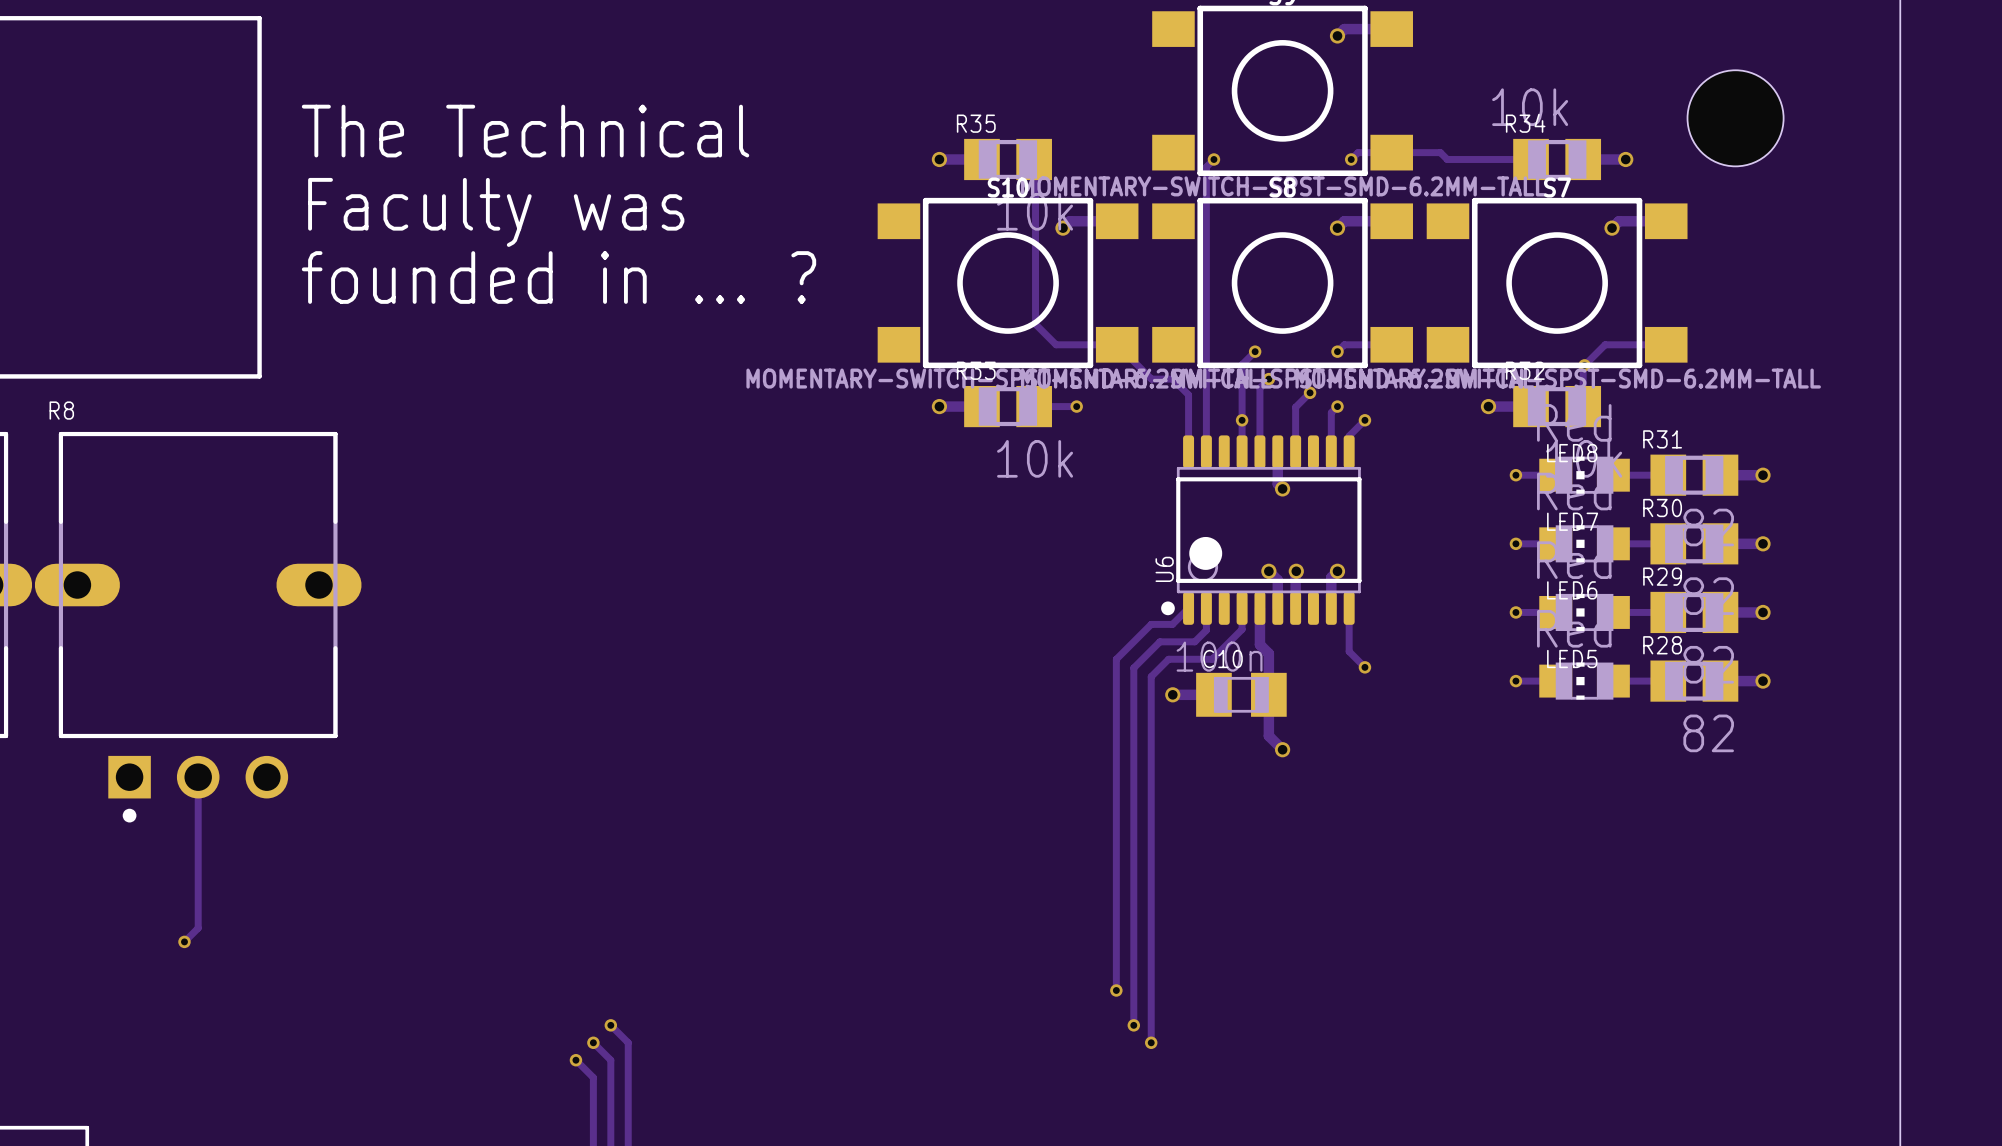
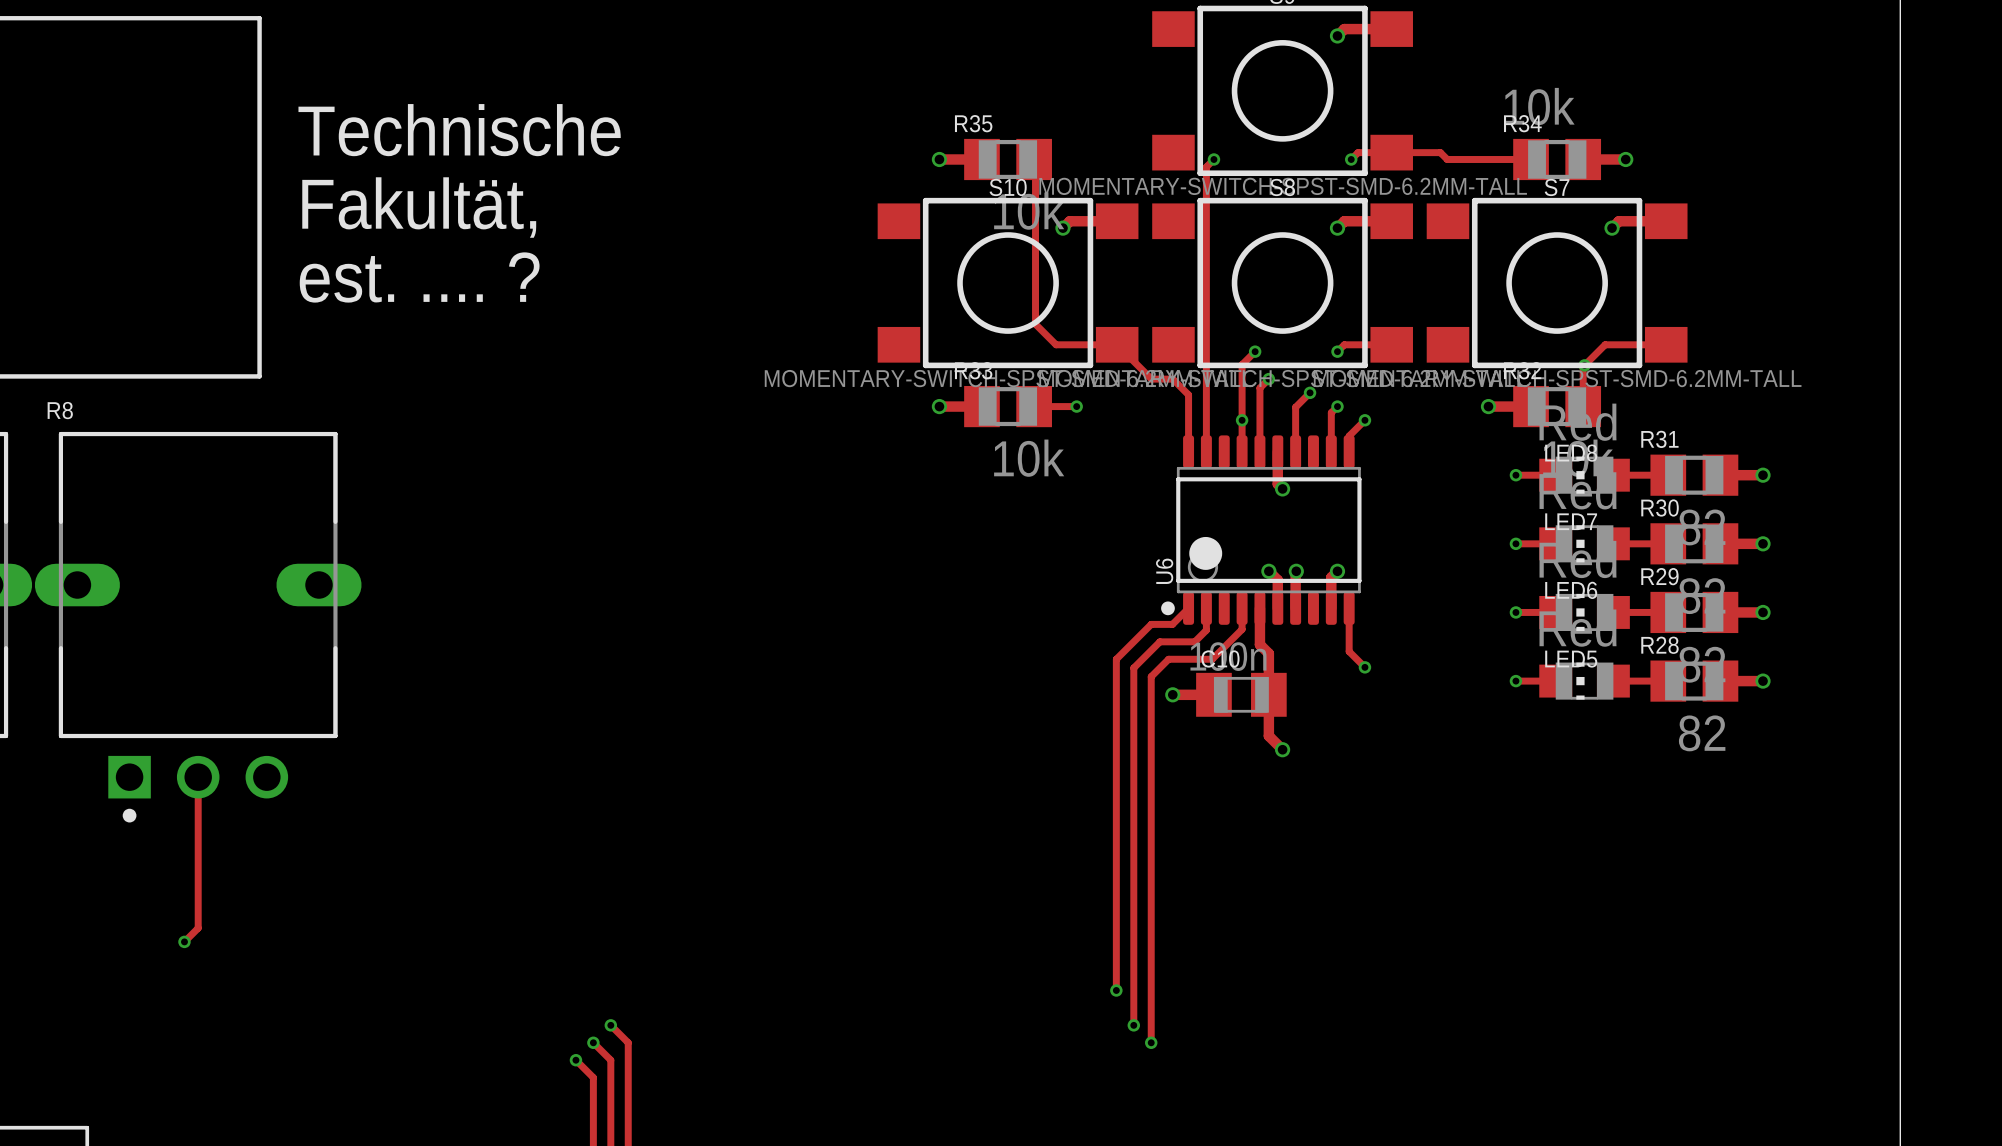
hole: (1735, 118) -> none
text: The Technical (525, 131) -> Technische (459, 130)
text: Faculty was (496, 212) -> Fakultät, (419, 207)
text: founded in ... ? (559, 277) -> est. .... ? (419, 277)

